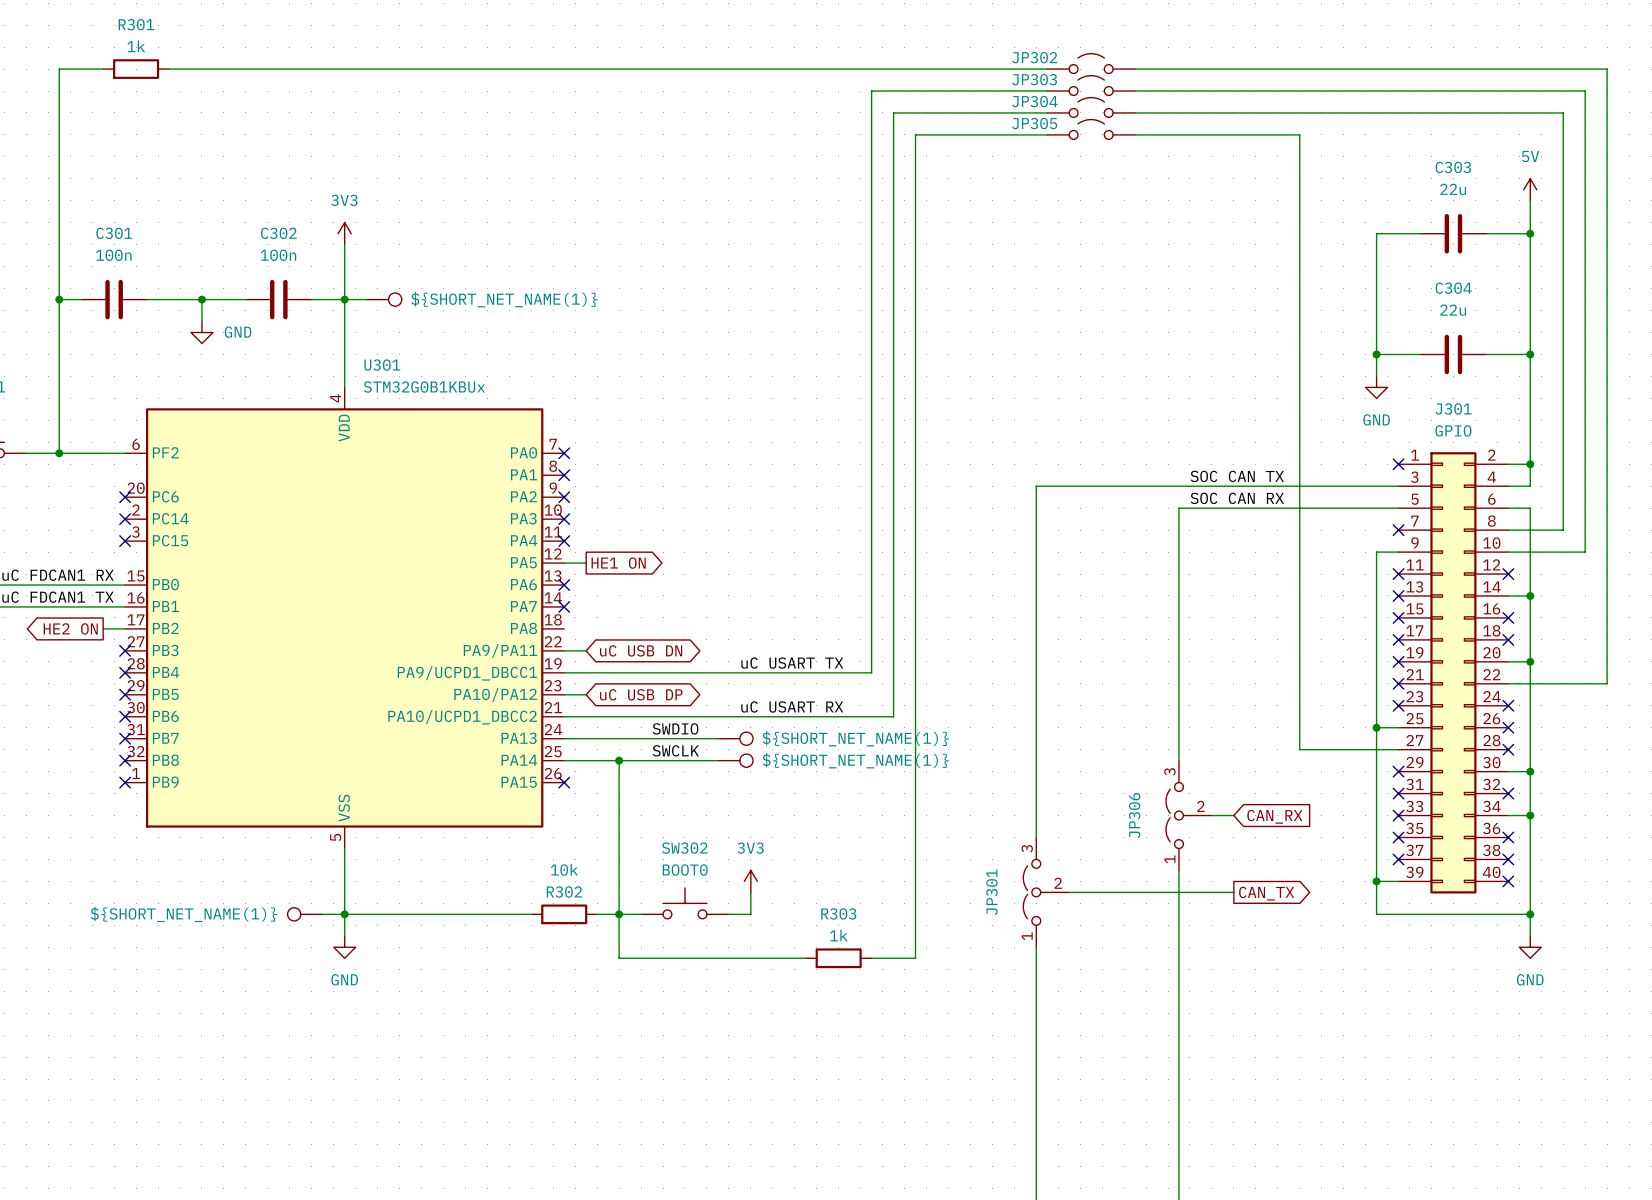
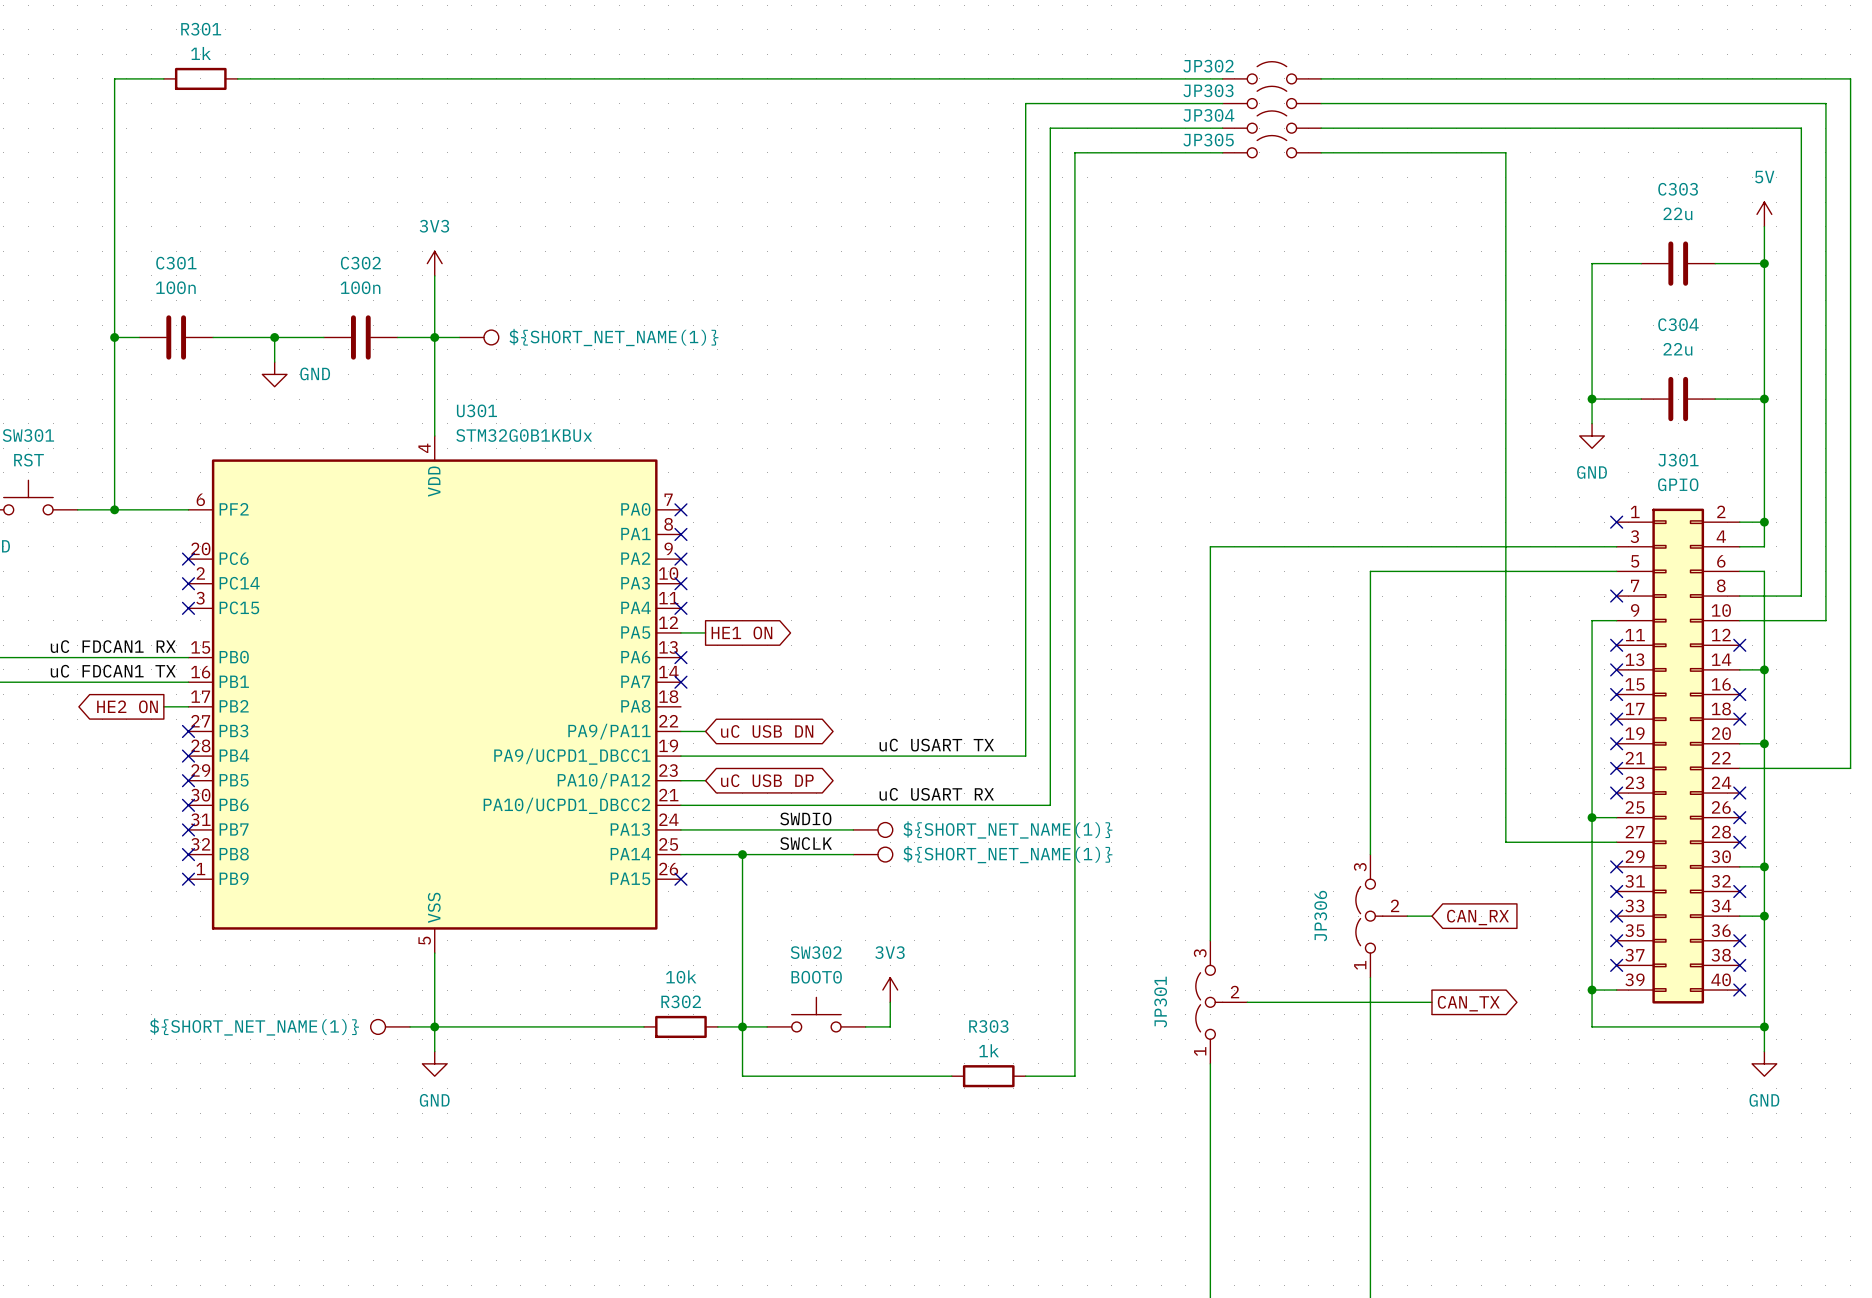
label: SOC CAN TX (1237, 476) -> none
label: SOC CAN RX (1237, 498) -> none

